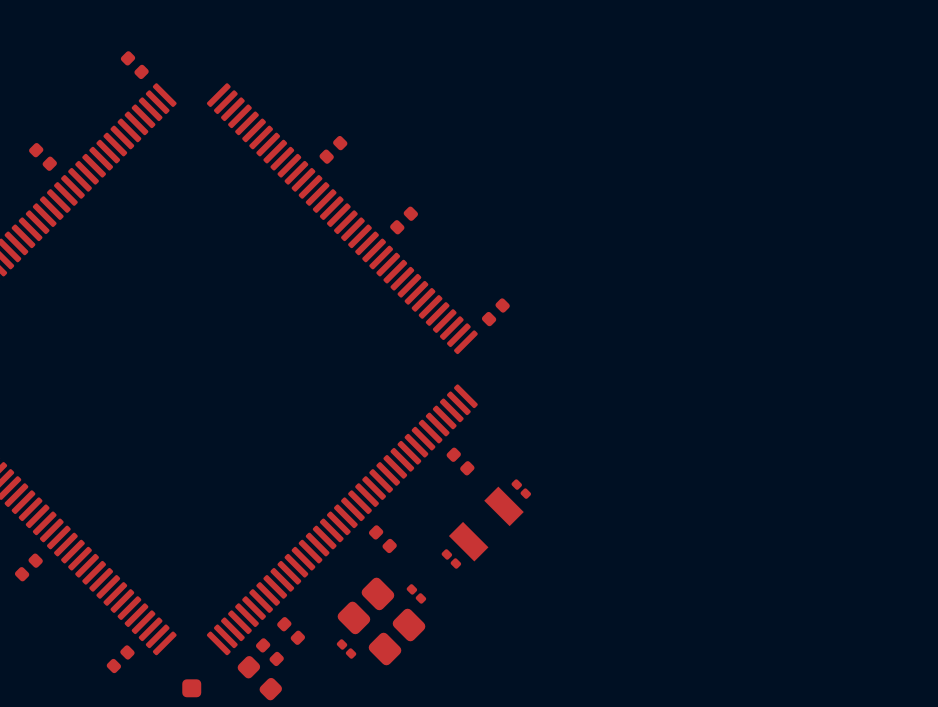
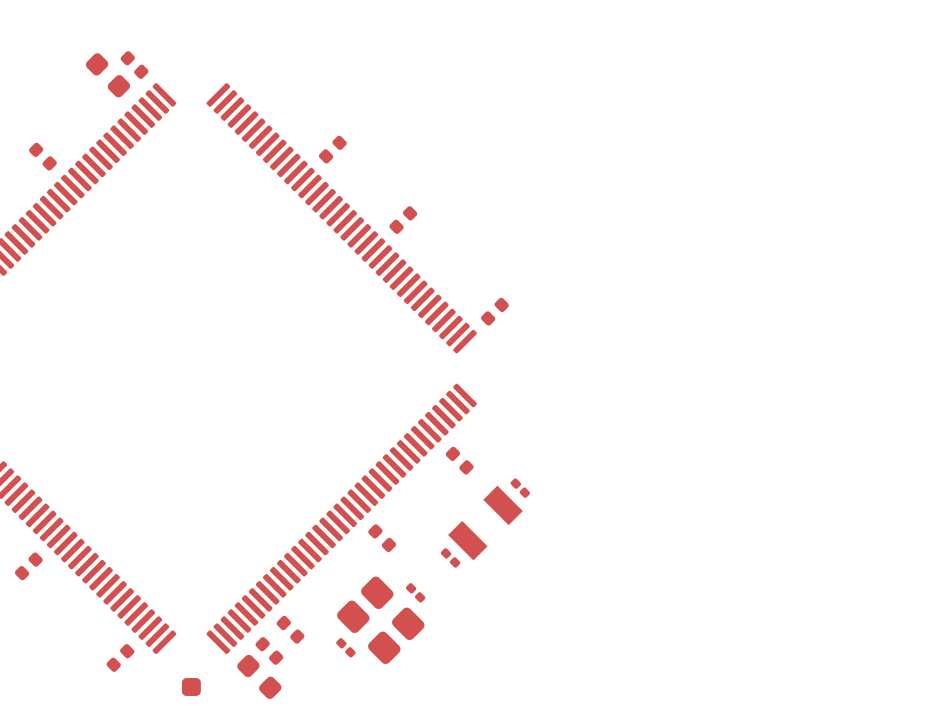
part: none -> (107, 75)

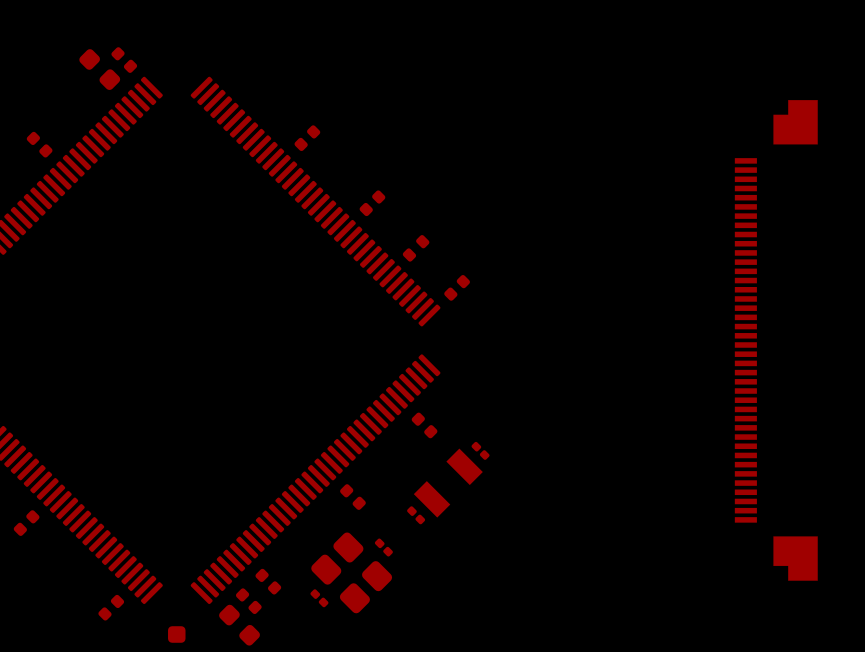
part: none -> (416, 248)
part: none -> (776, 340)

